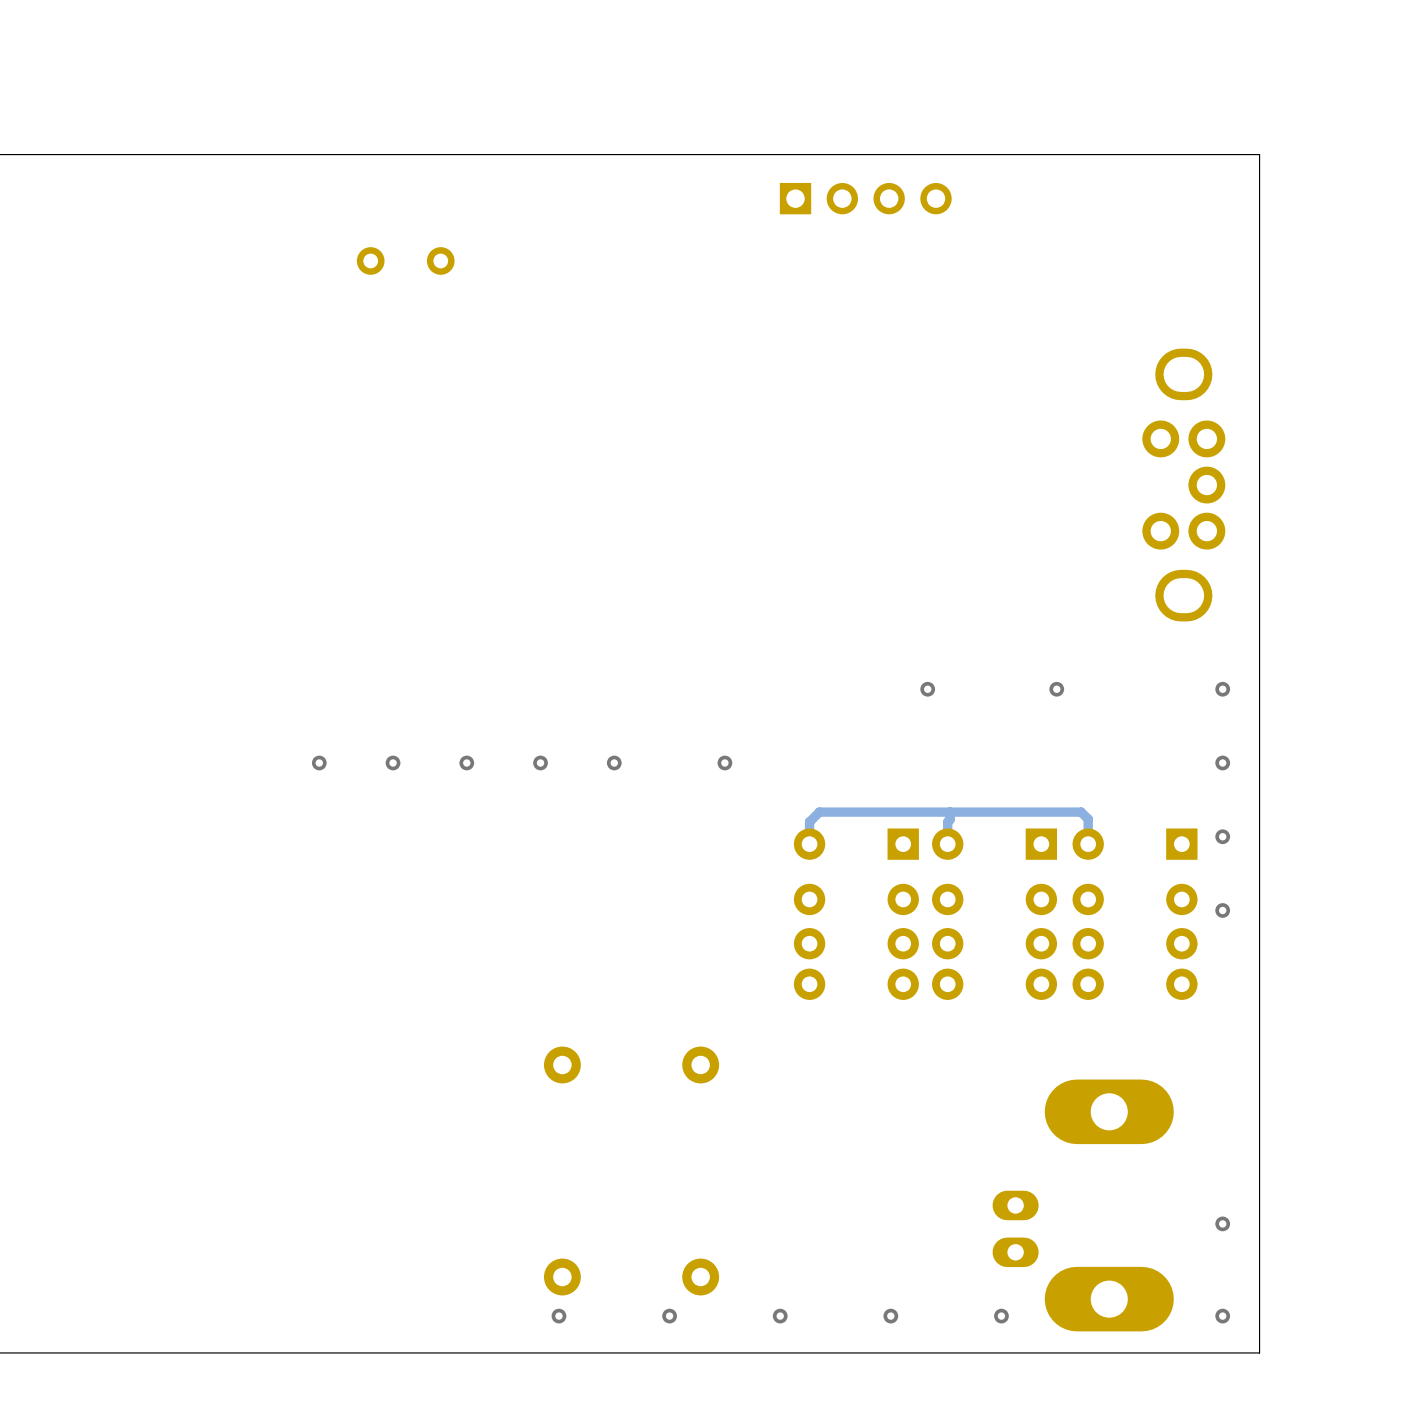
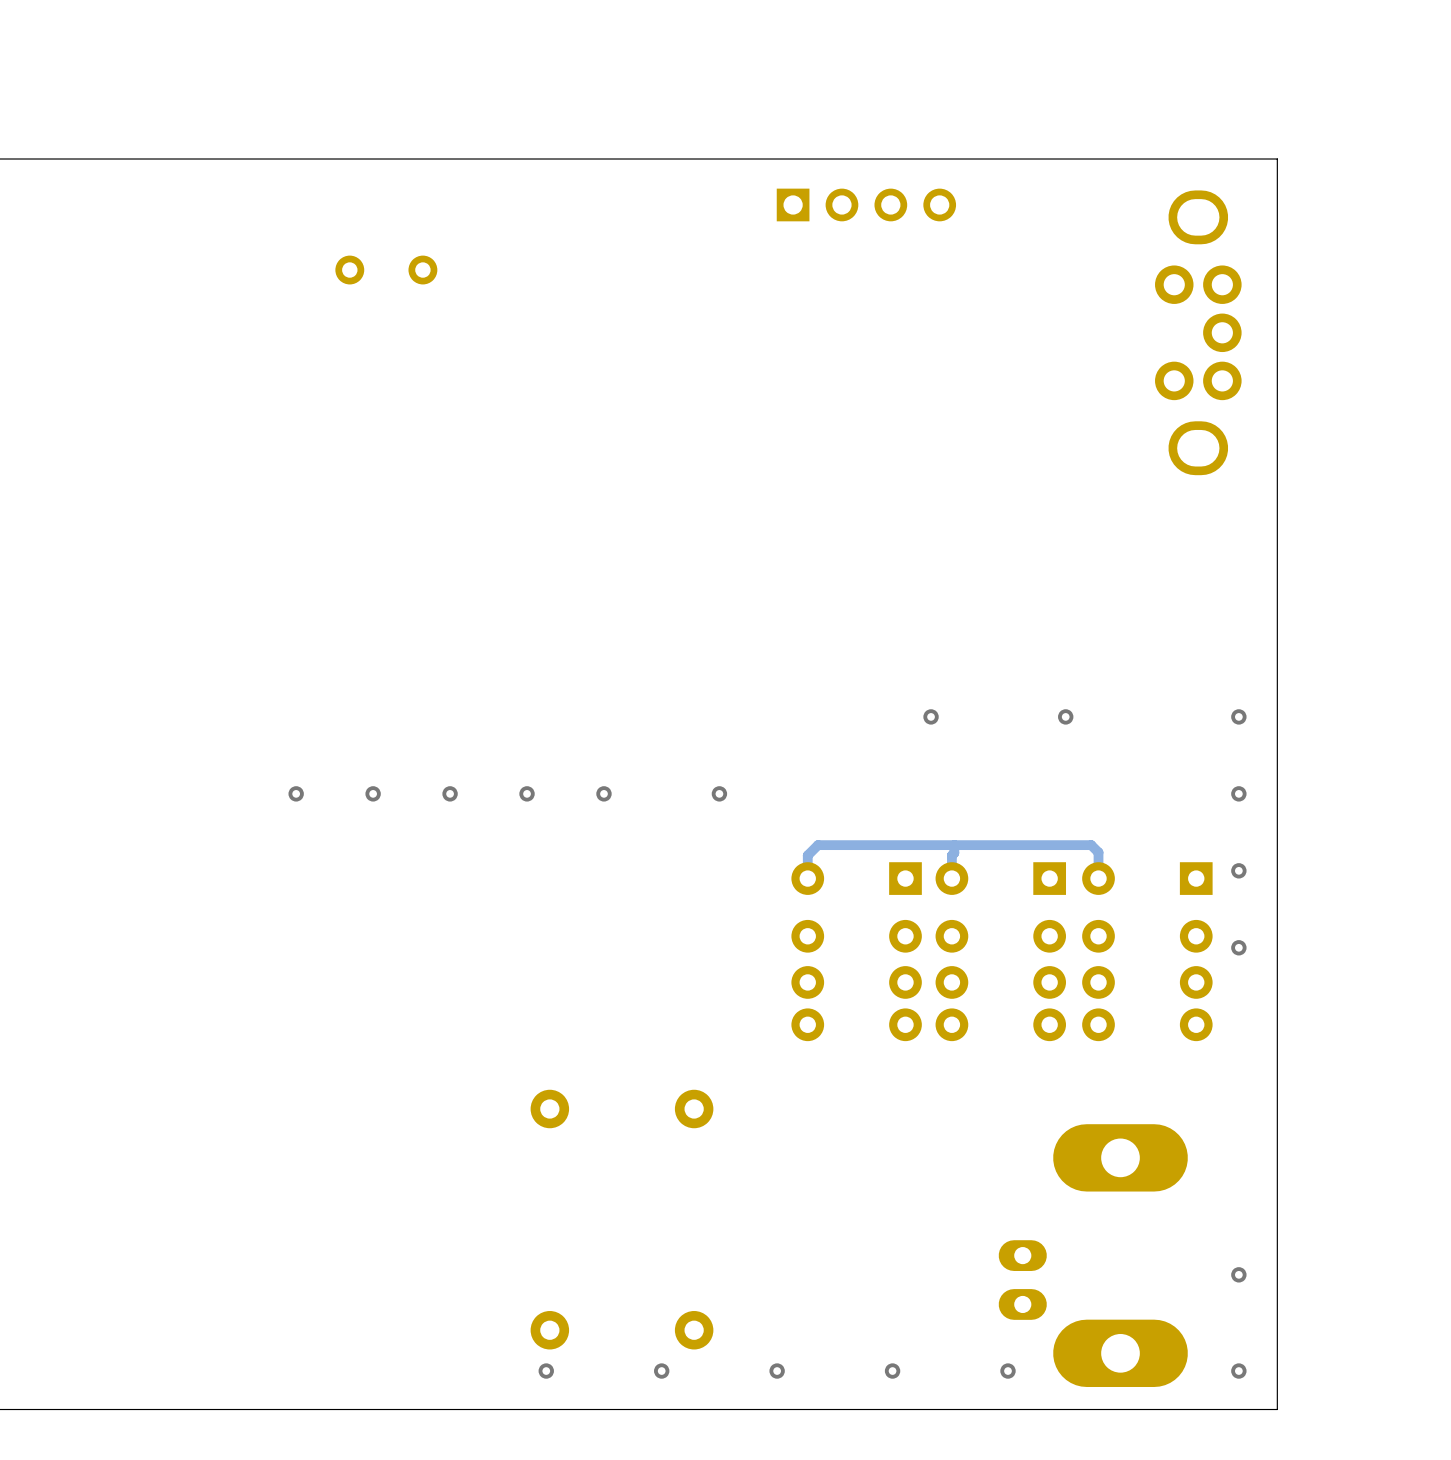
part position: (1183, 485) -> (1198, 332)

